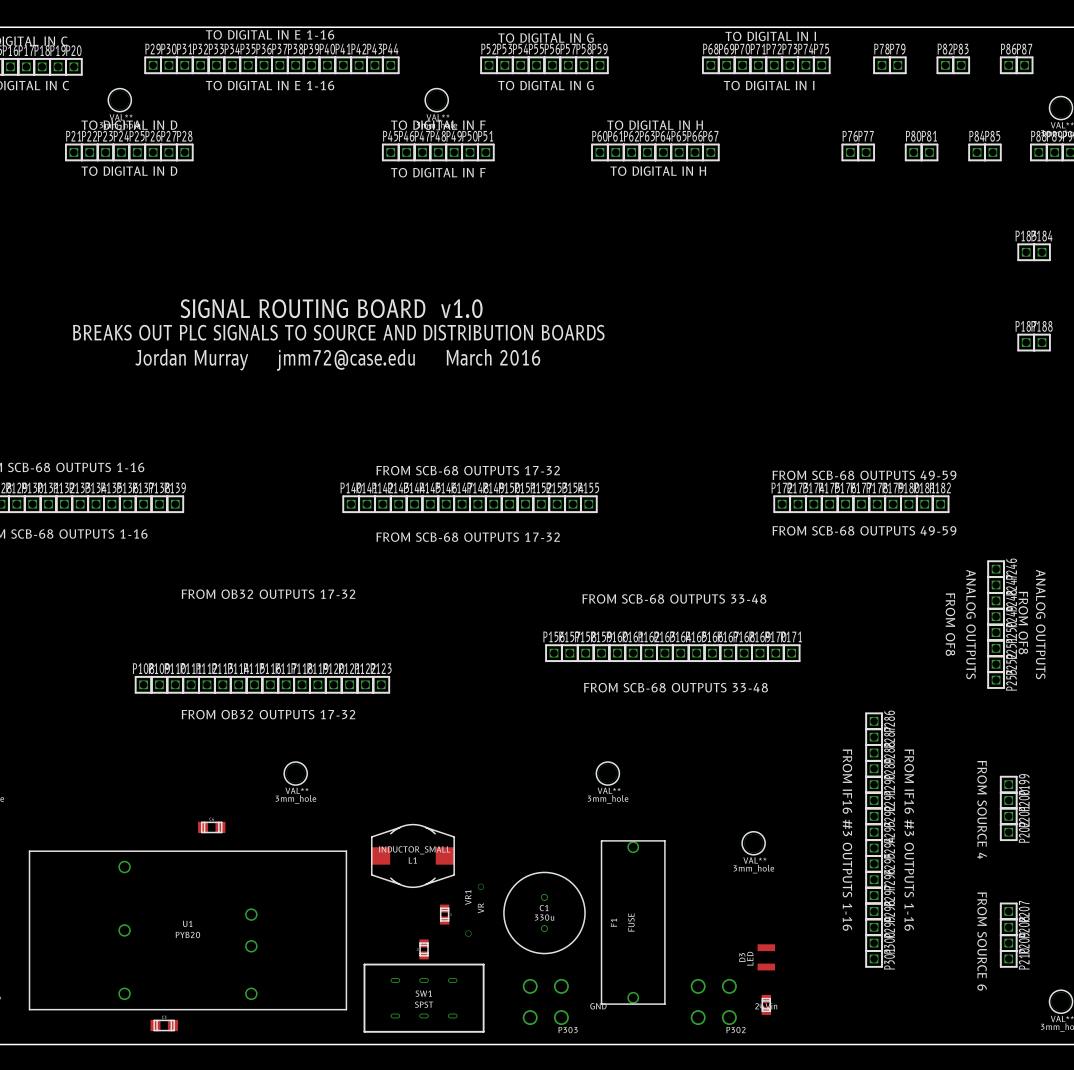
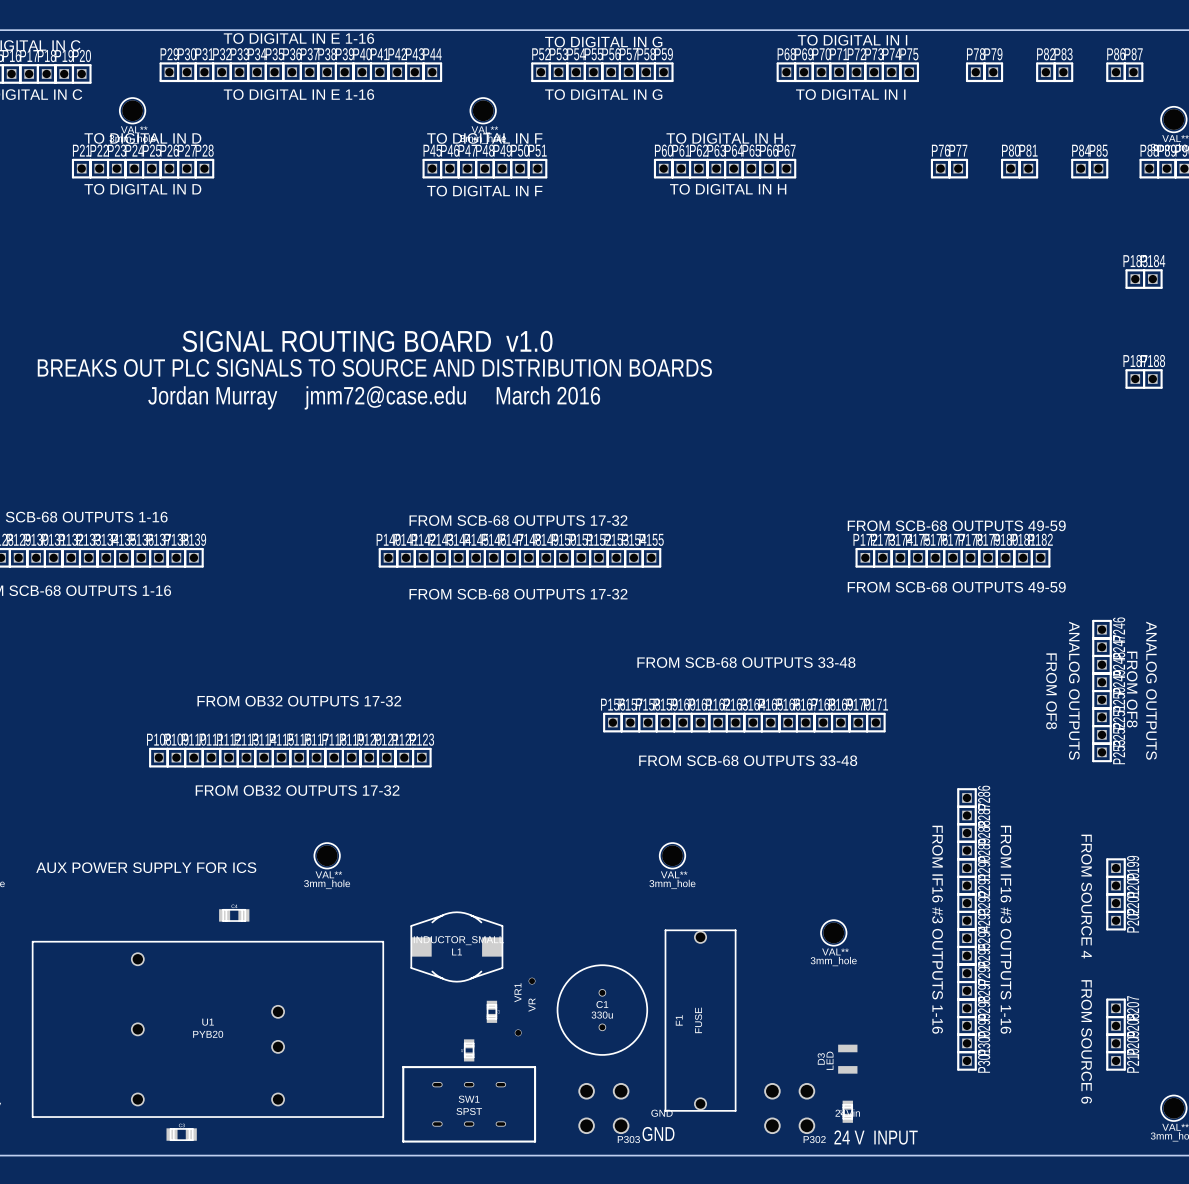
text position: FROM OB32 OUTPUTS 17-32 (268, 594) -> FROM OB32 OUTPUTS 17-32 (299, 701)
text: none -> AUX POWER SUPPLY FOR ICS (146, 867)
text: none -> GND (658, 1134)
text: none -> 24 V INPUT (876, 1137)

